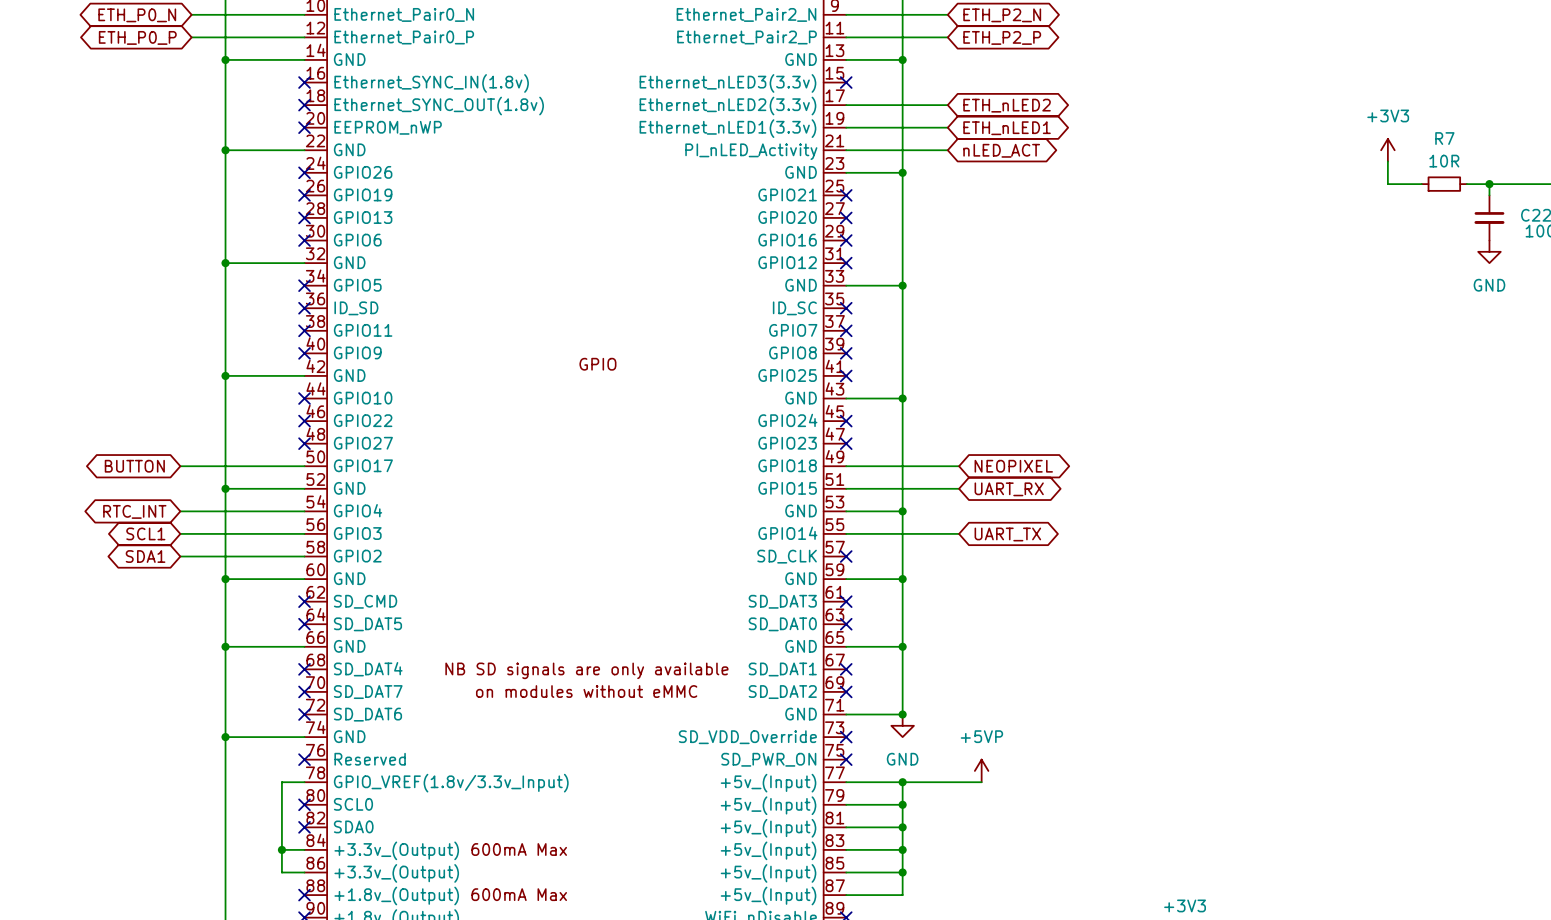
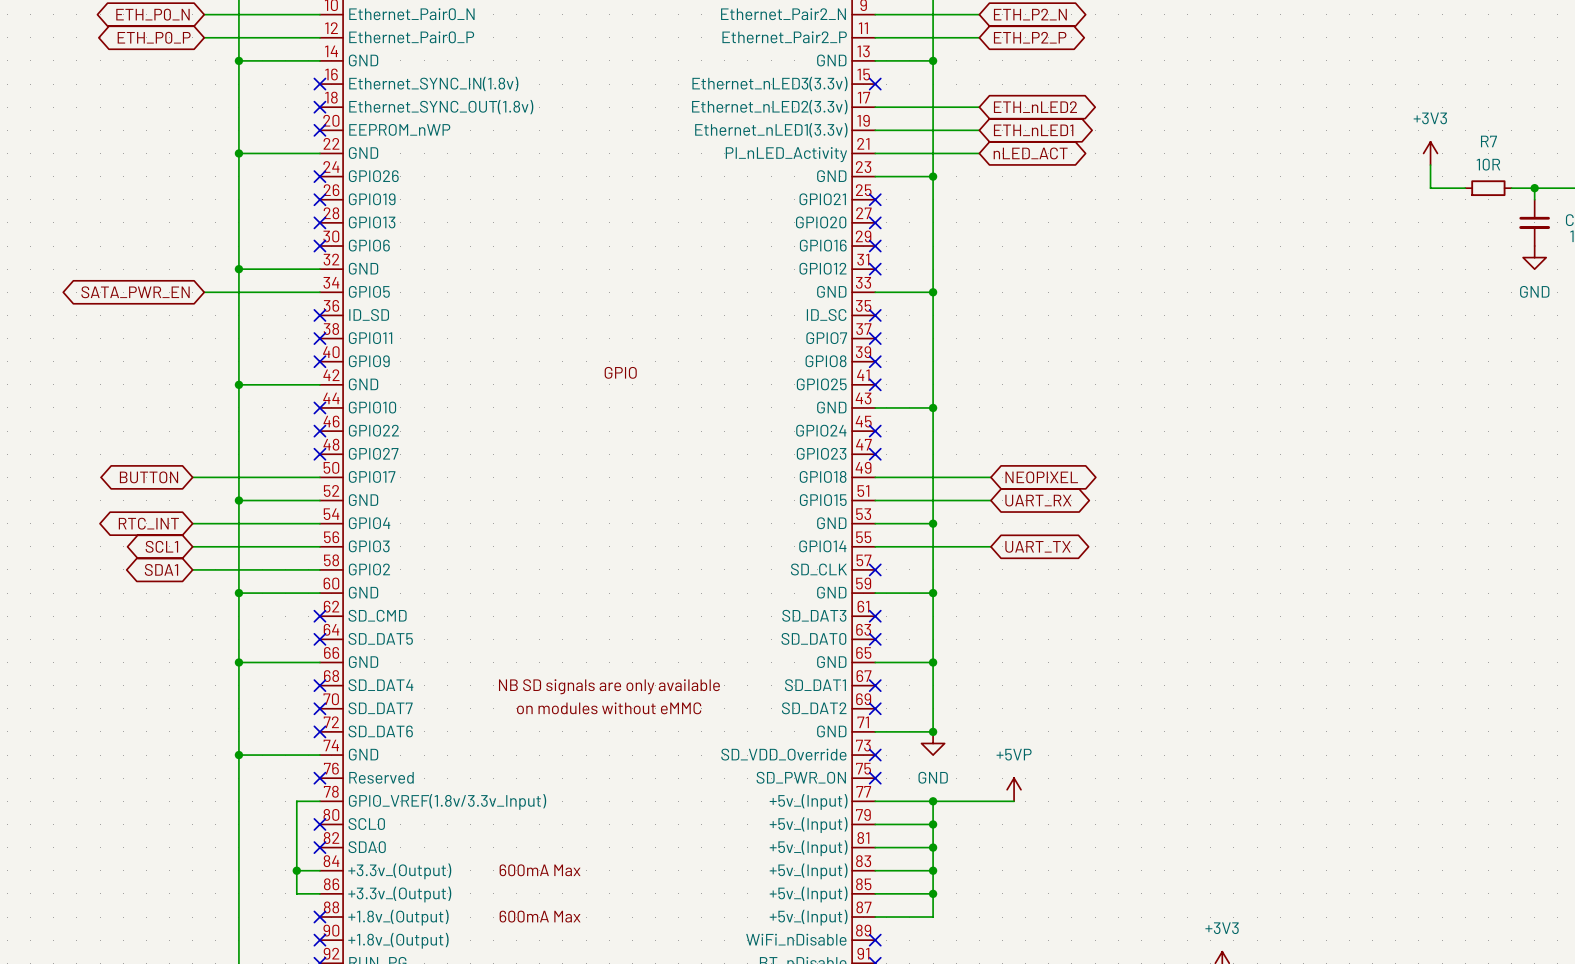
wire: none -> (204, 292) (319, 292)
no-connect mark: (304, 285) -> none
global label: none -> SATA_PWR_EN (135, 292)

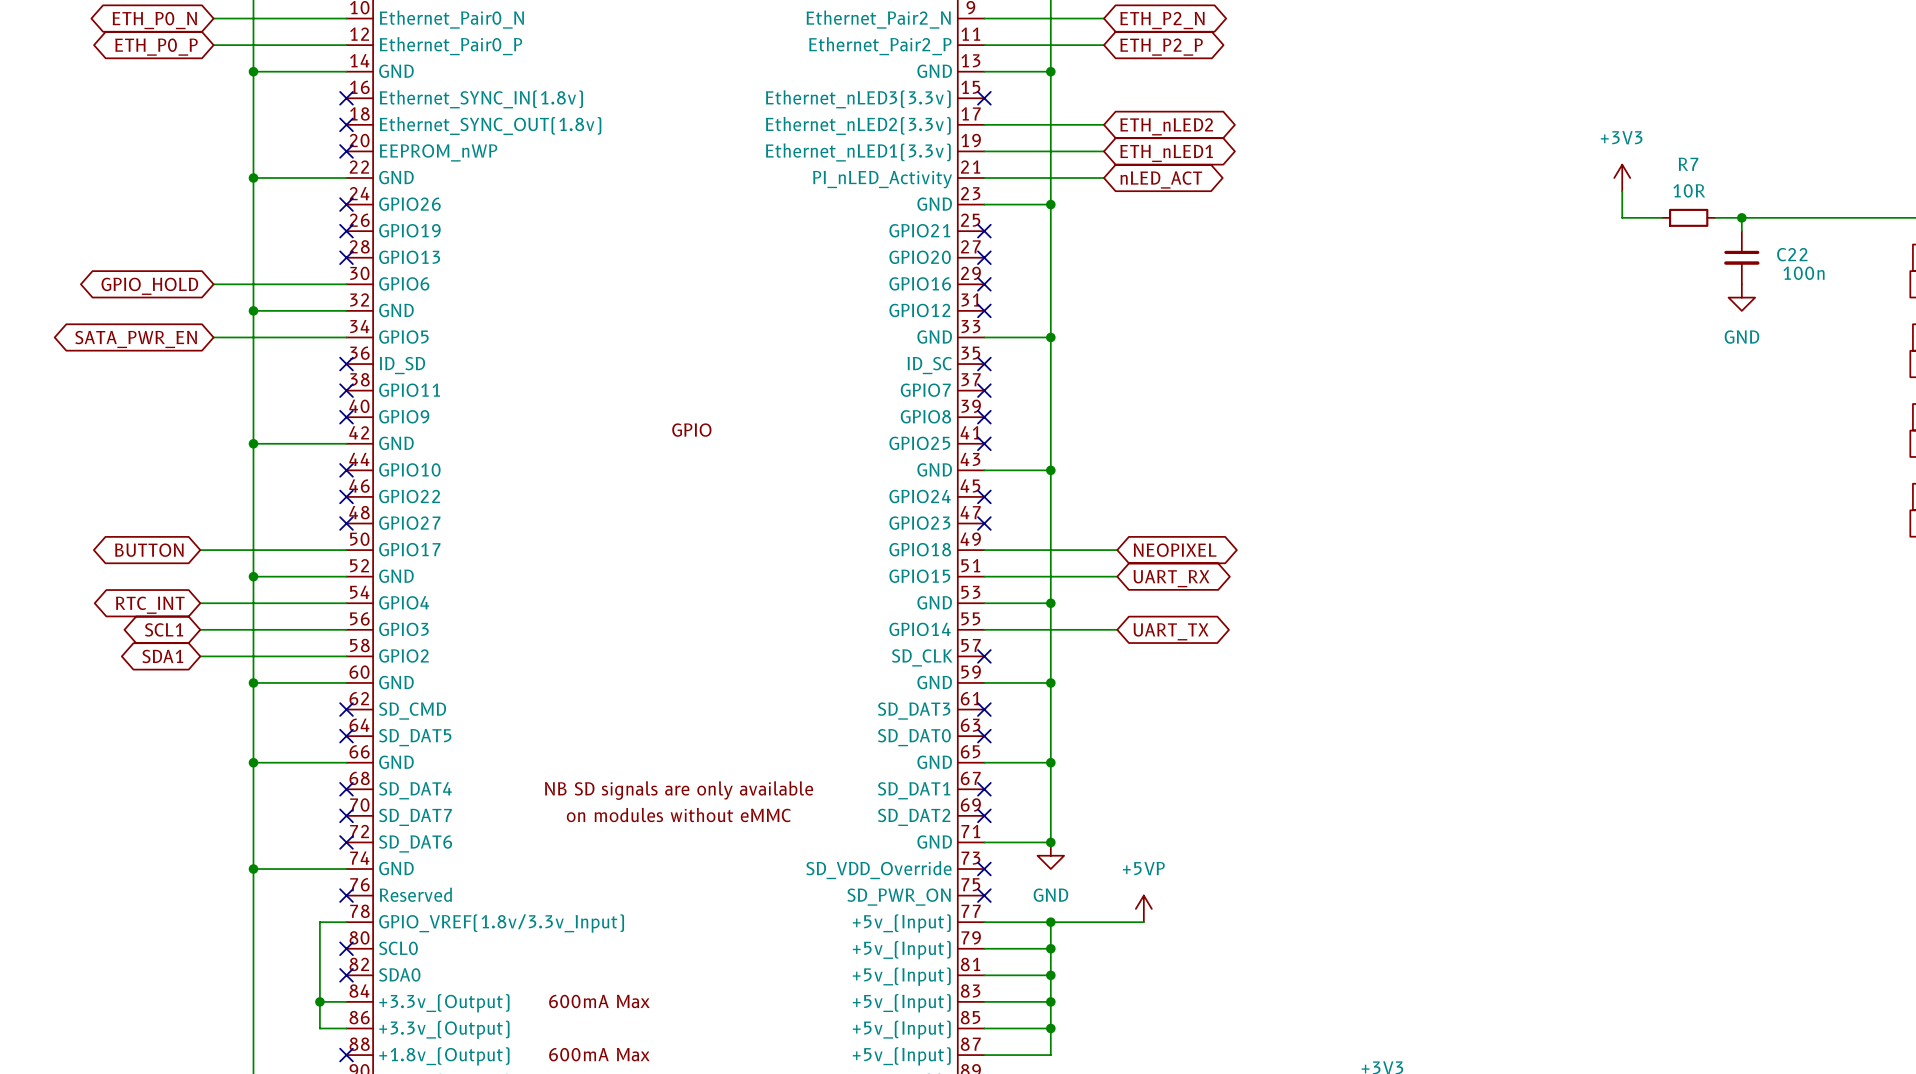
global label: none -> GPIO_HOLD (149, 286)
wire: none -> (213, 284) (346, 284)
no-connect mark: (319, 246) -> none

